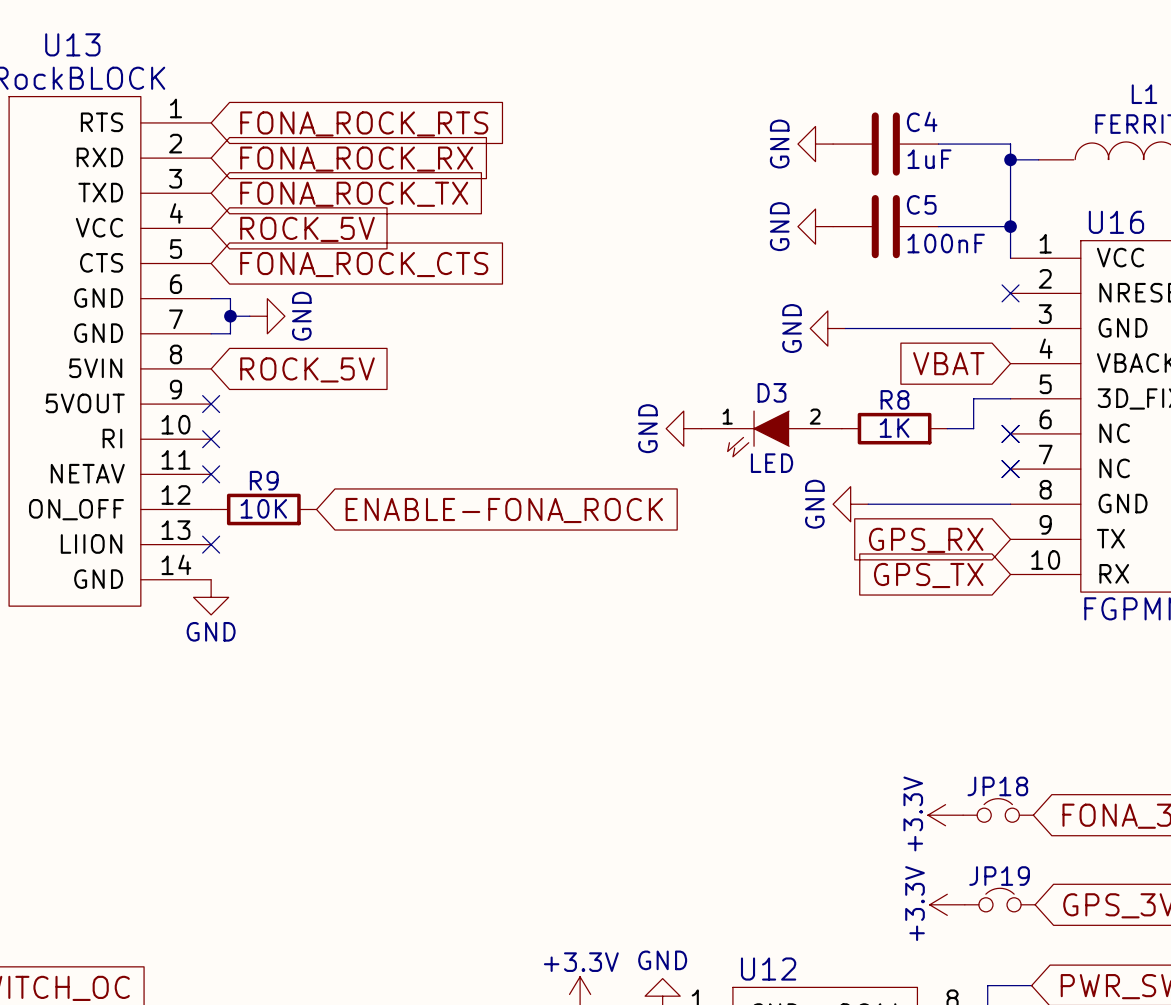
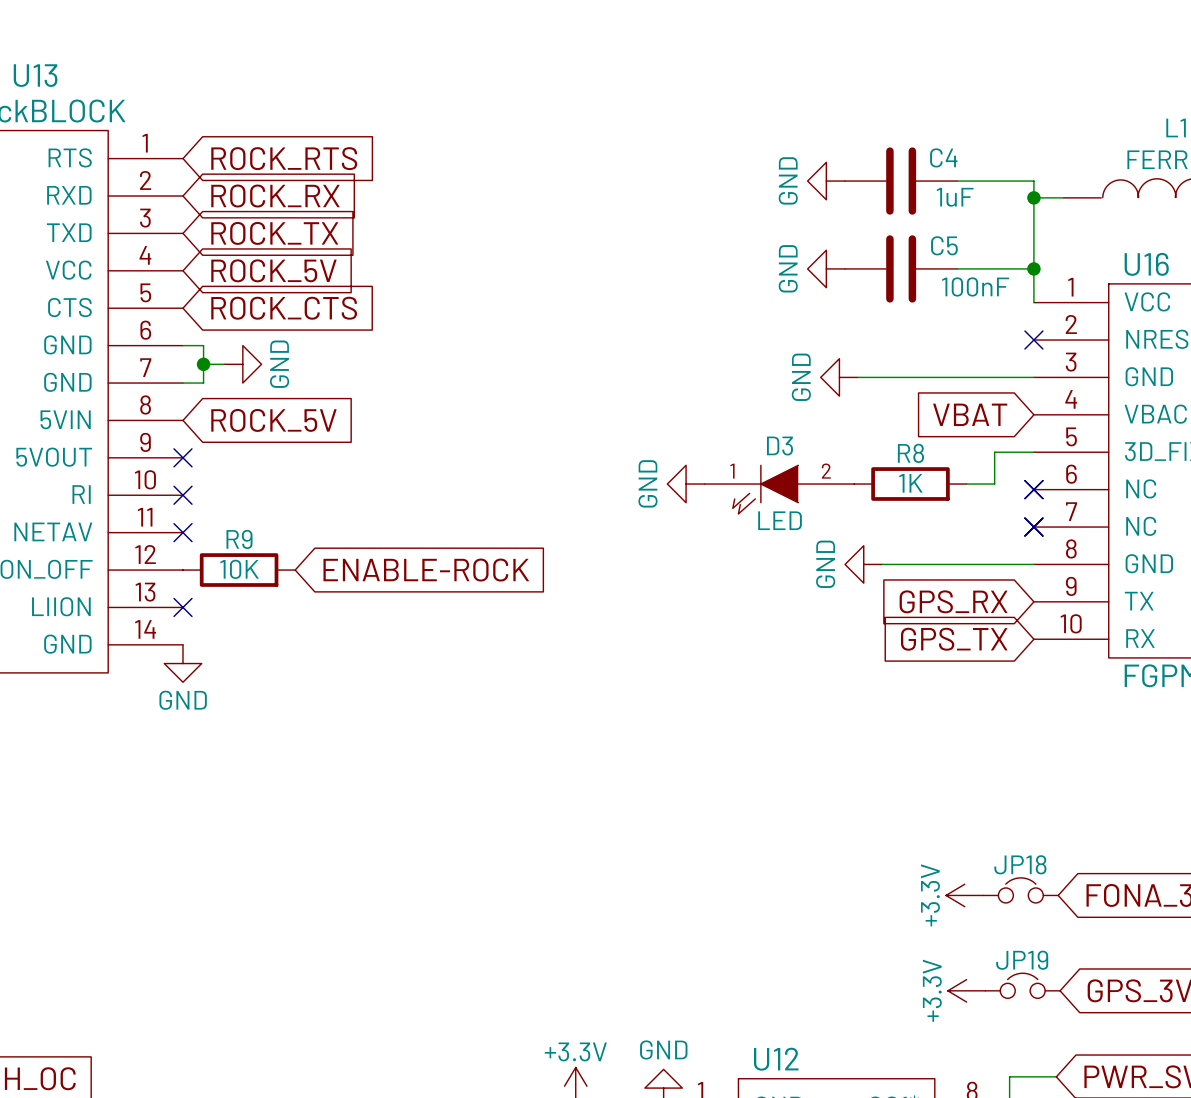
global label: FONA_ROCK_RTS (364, 123) -> ROCK_RTS (284, 158)
global label: FONA_ROCK_RX (356, 159) -> ROCK_RX (275, 196)
global label: FONA_ROCK_TX (354, 194) -> ROCK_TX (274, 233)
global label: FONA_ROCK_CTS (364, 264) -> ROCK_CTS (284, 308)
global label: ENABLE-FONA_ROCK (504, 510) -> ENABLE-ROCK (426, 570)

